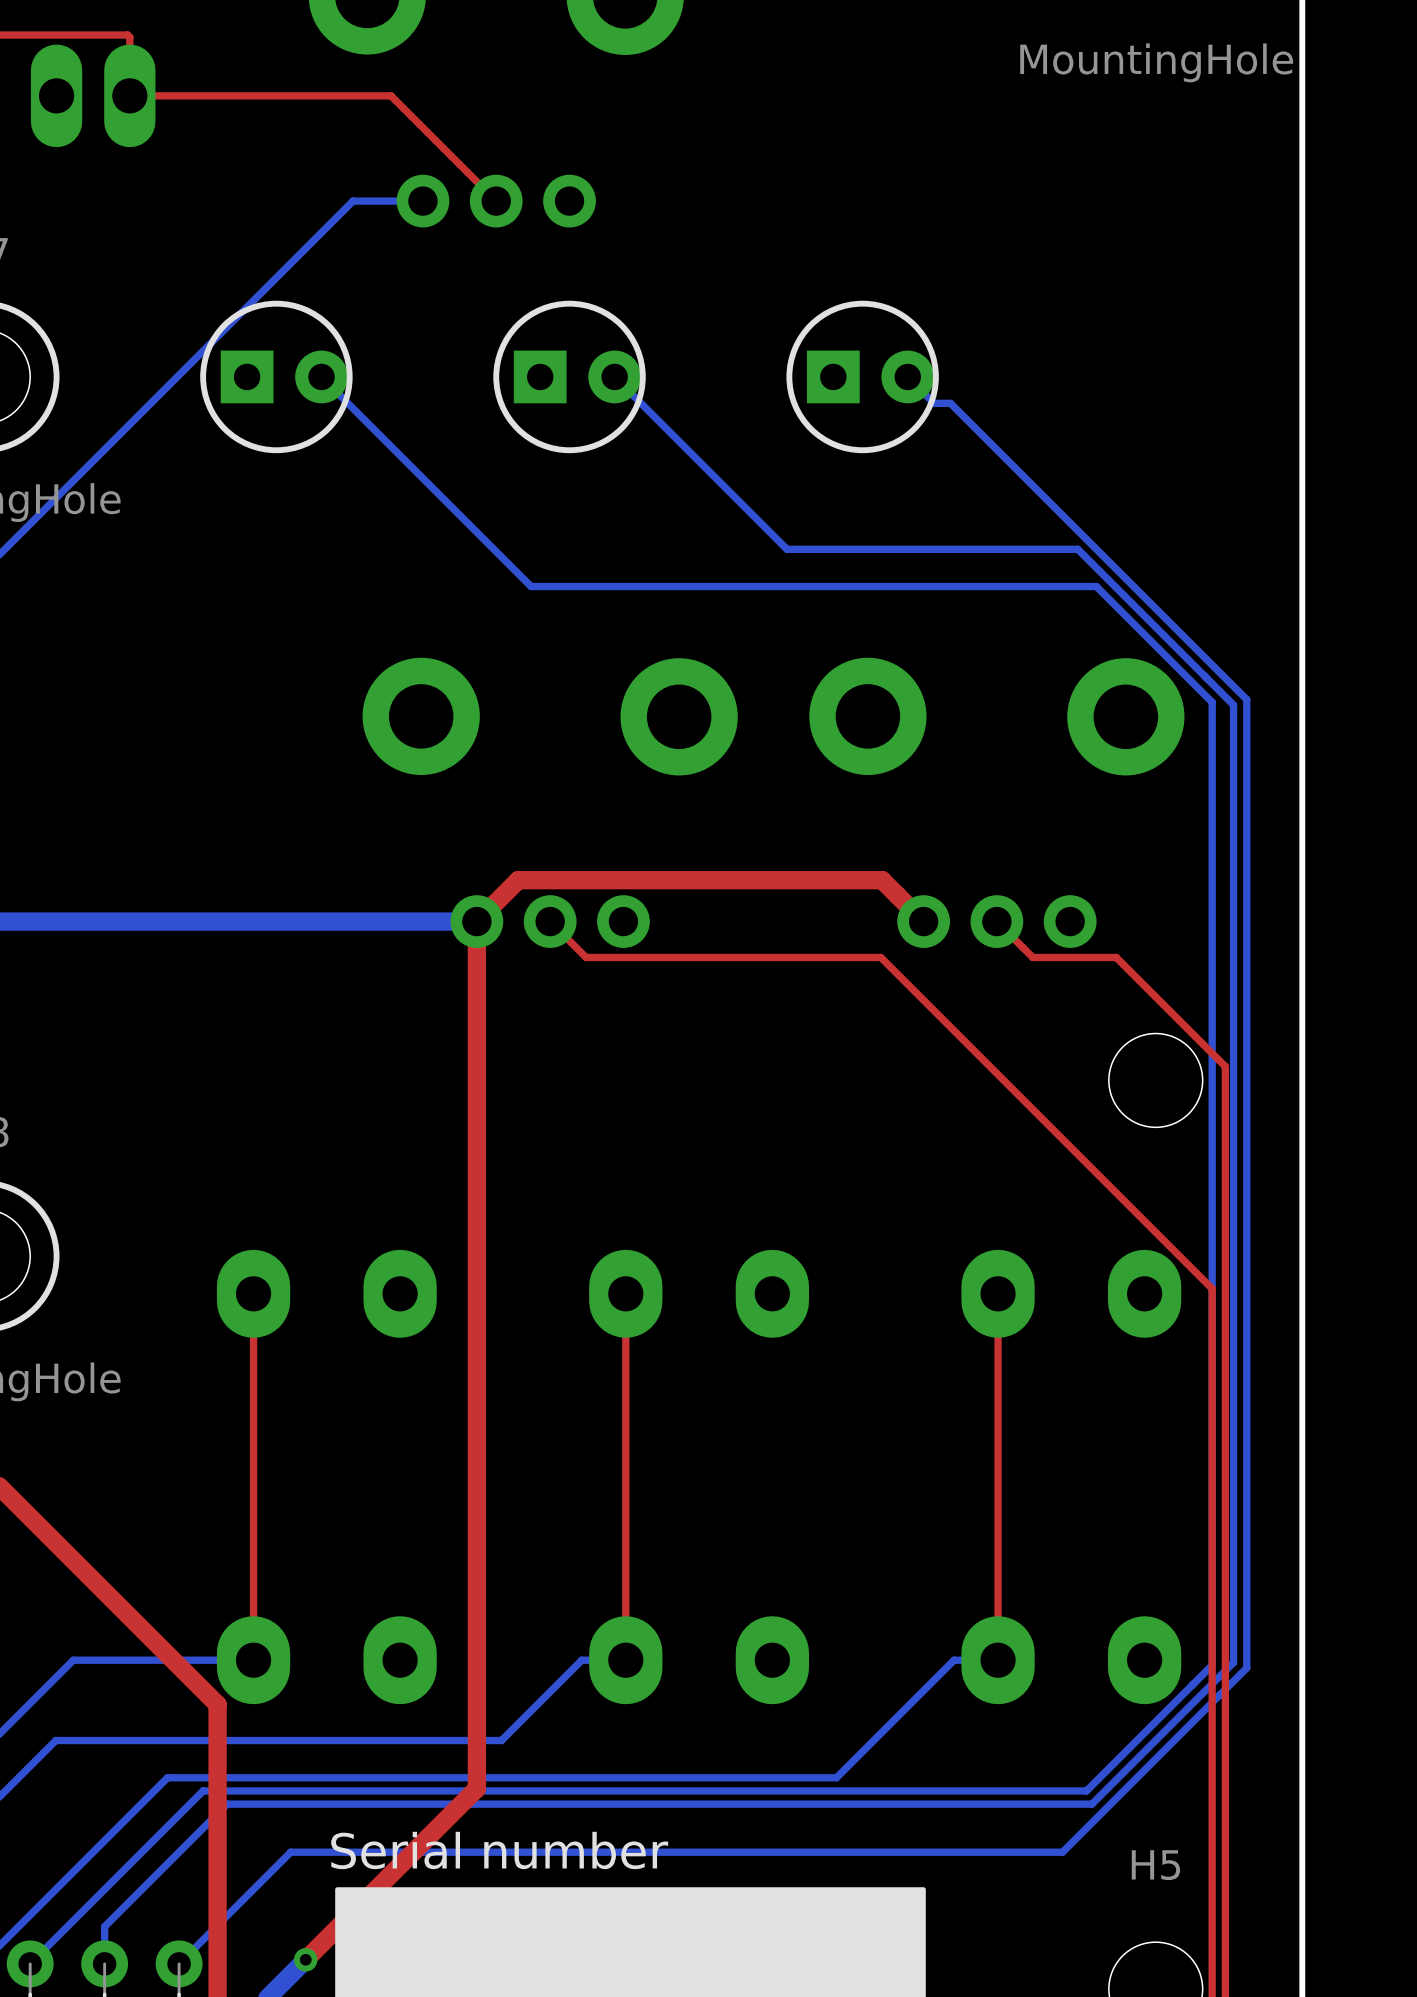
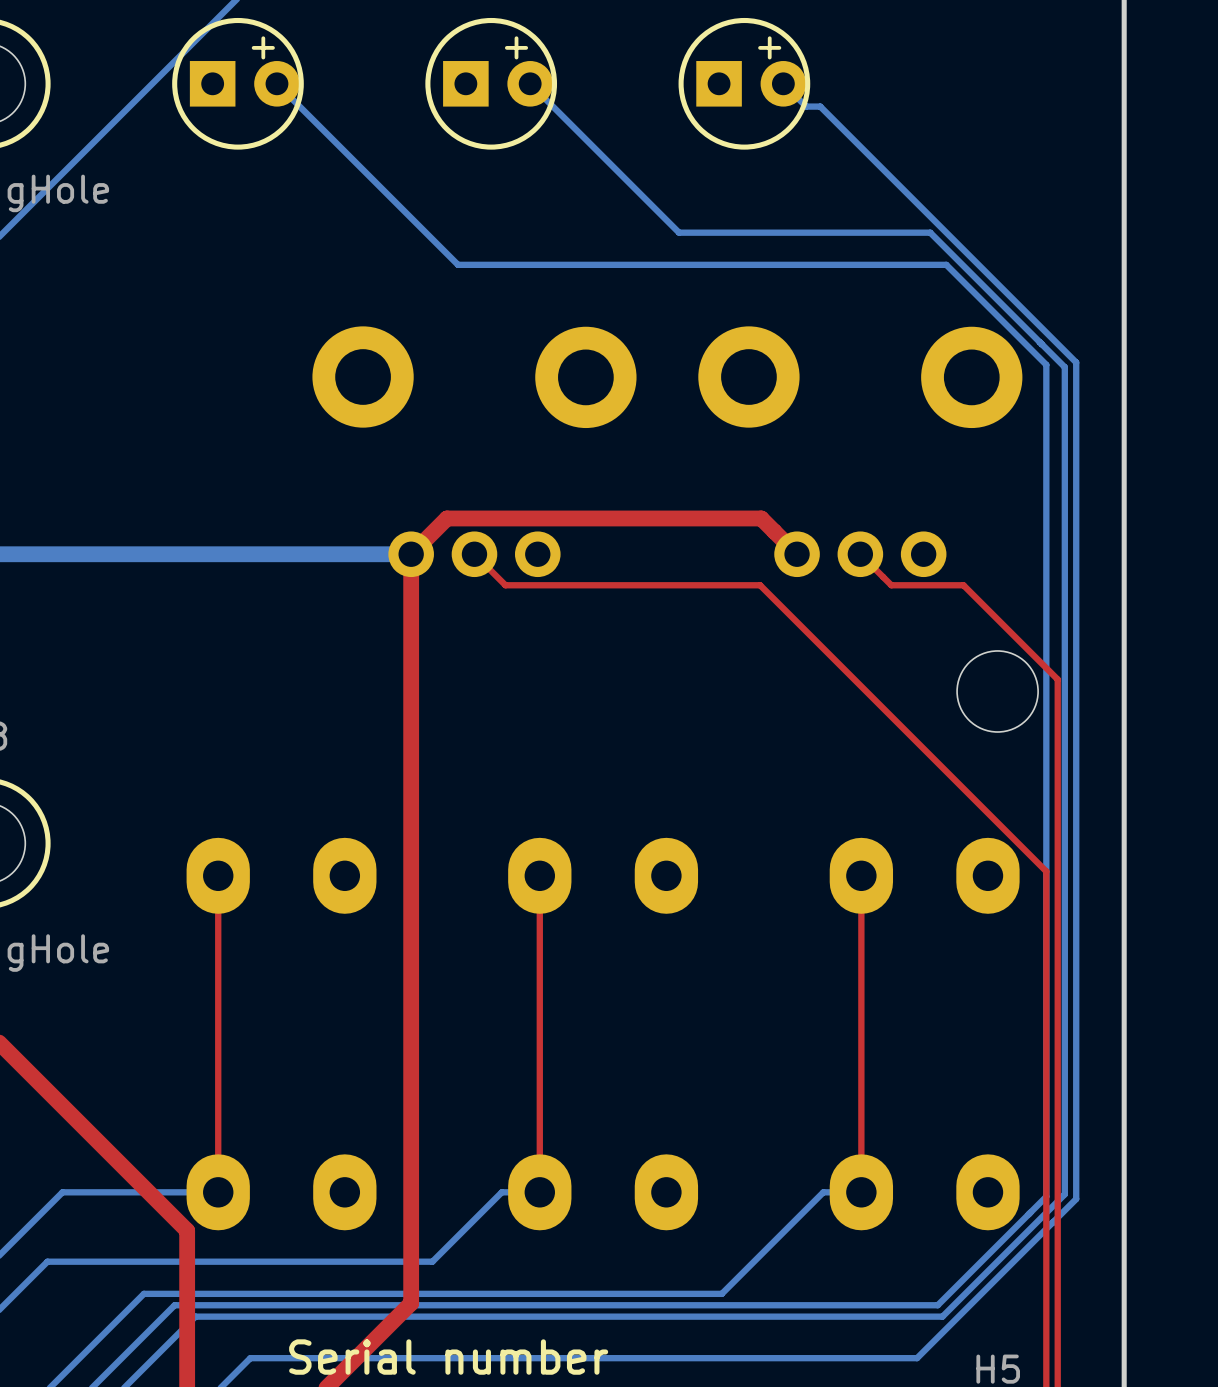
text: none -> + (263, 47)
text: none -> + (516, 47)
text: none -> + (769, 47)

